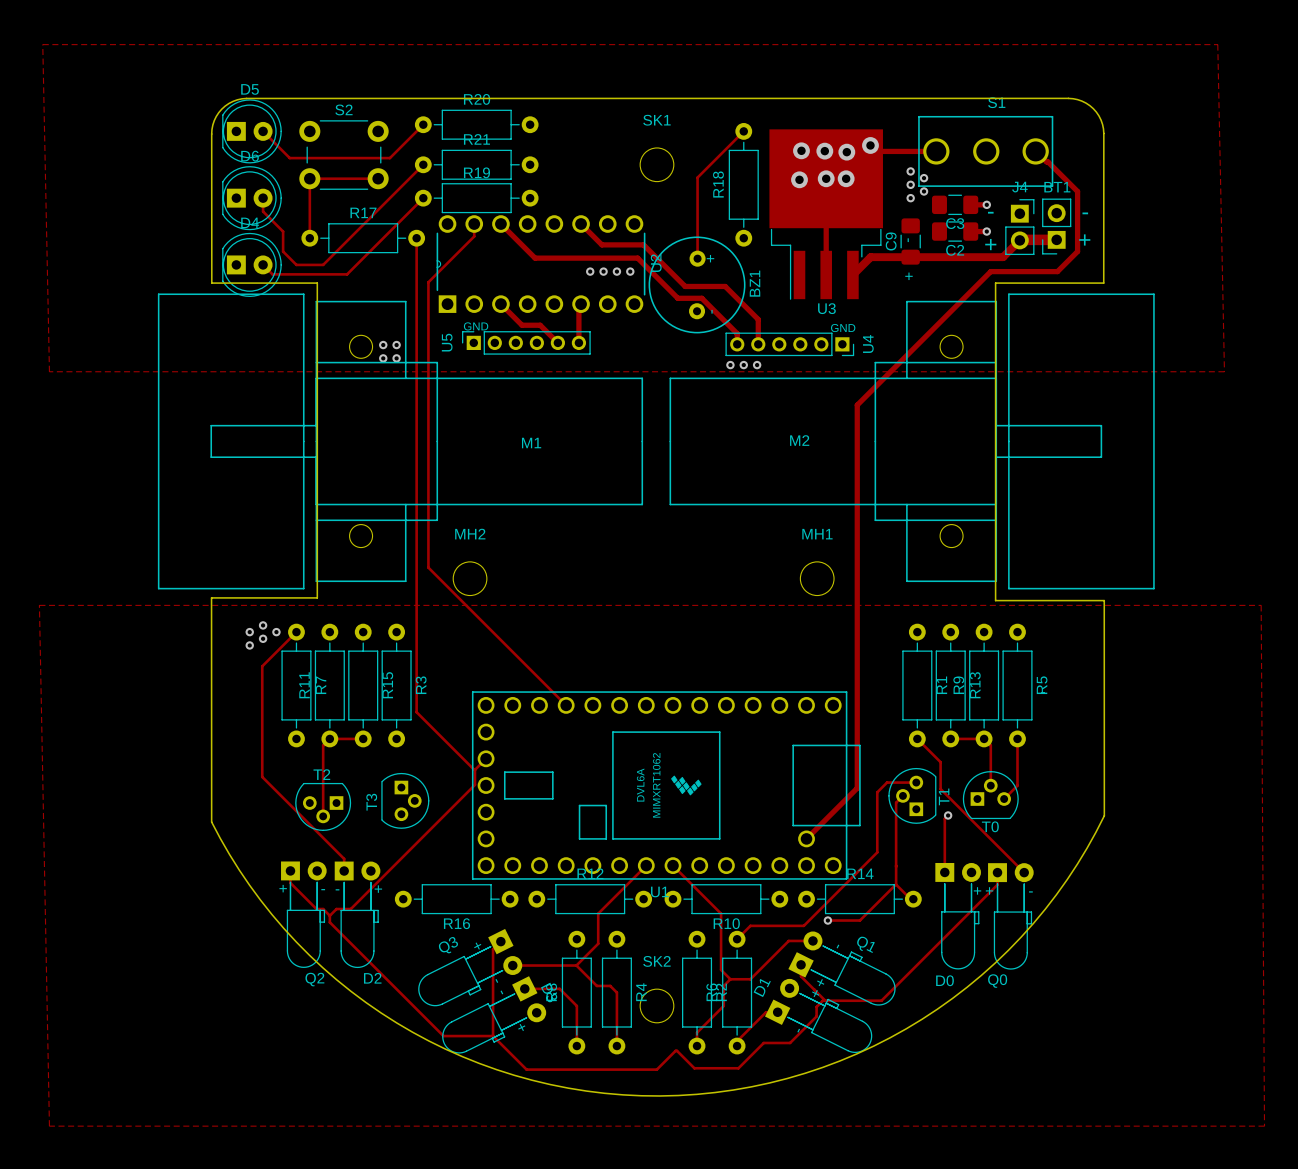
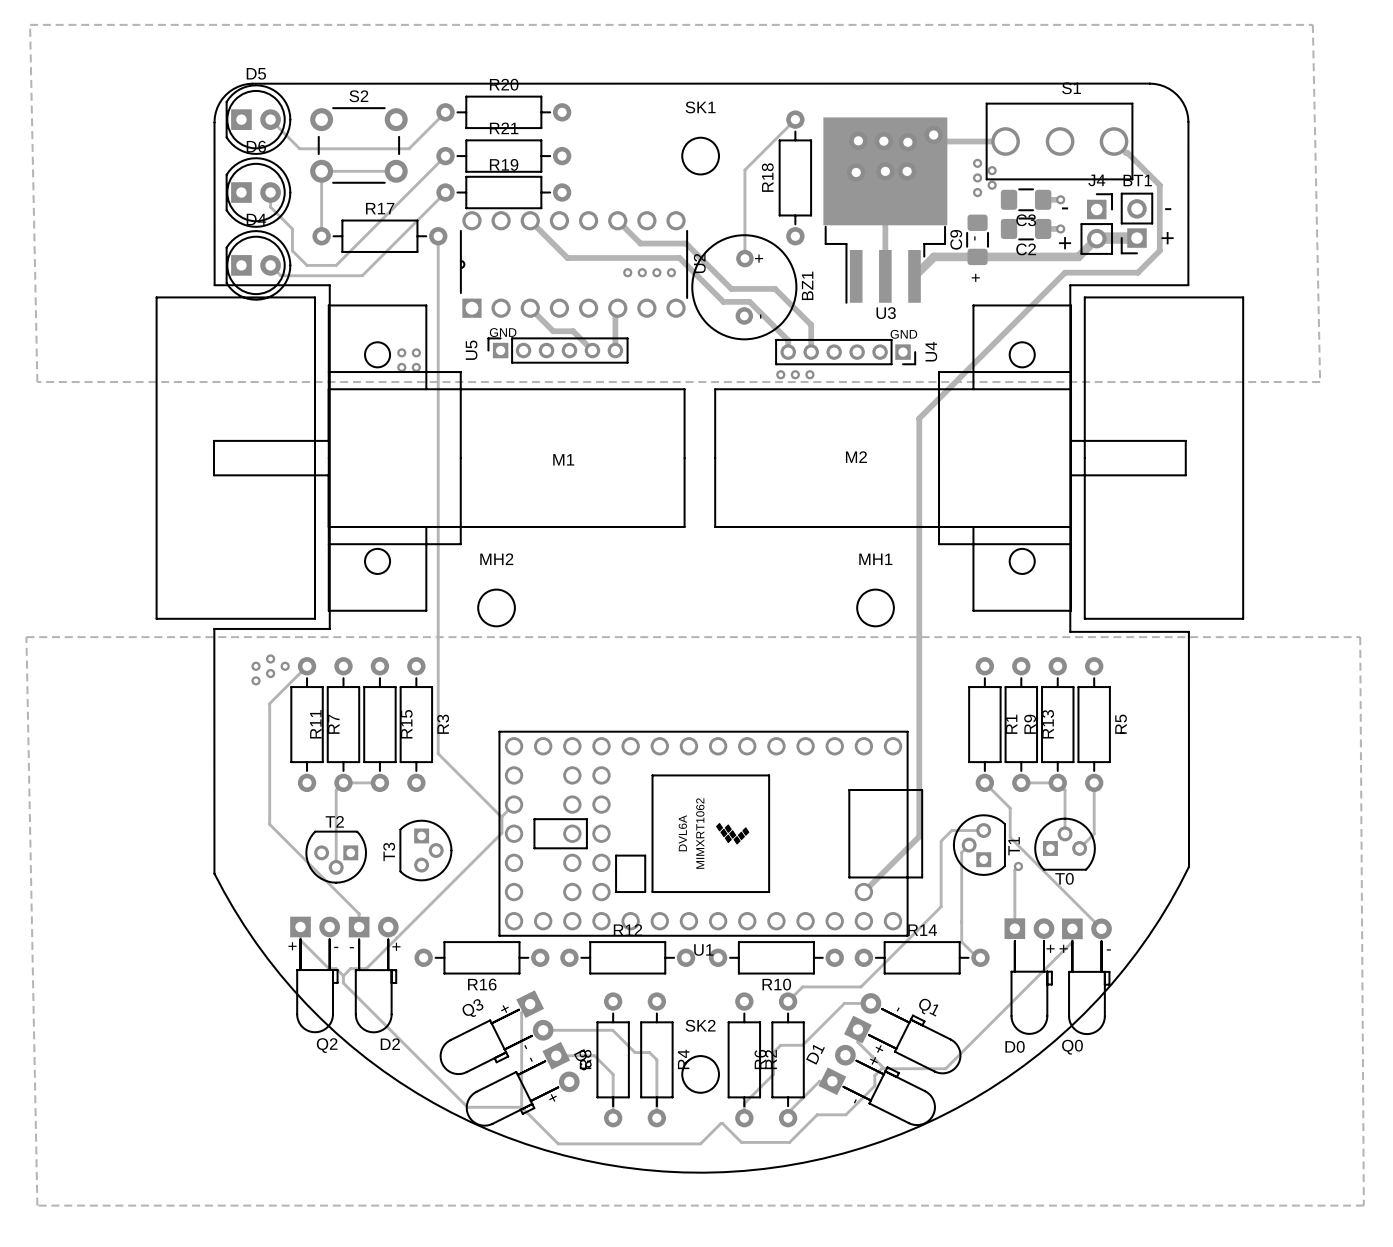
track: (474, 224) (474, 236) (428, 282) (428, 567) (566, 705) -> none
U1 footprint: [471, 691, 861, 880] -> [498, 730, 924, 937]
track: (646, 865) (598, 913) (598, 943) (576, 965) -> none
track: (673, 865) (721, 913) (721, 969) (730, 979) -> none
track: (896, 884) (859, 920) (827, 920) -> none
via: (827, 920) -> none

